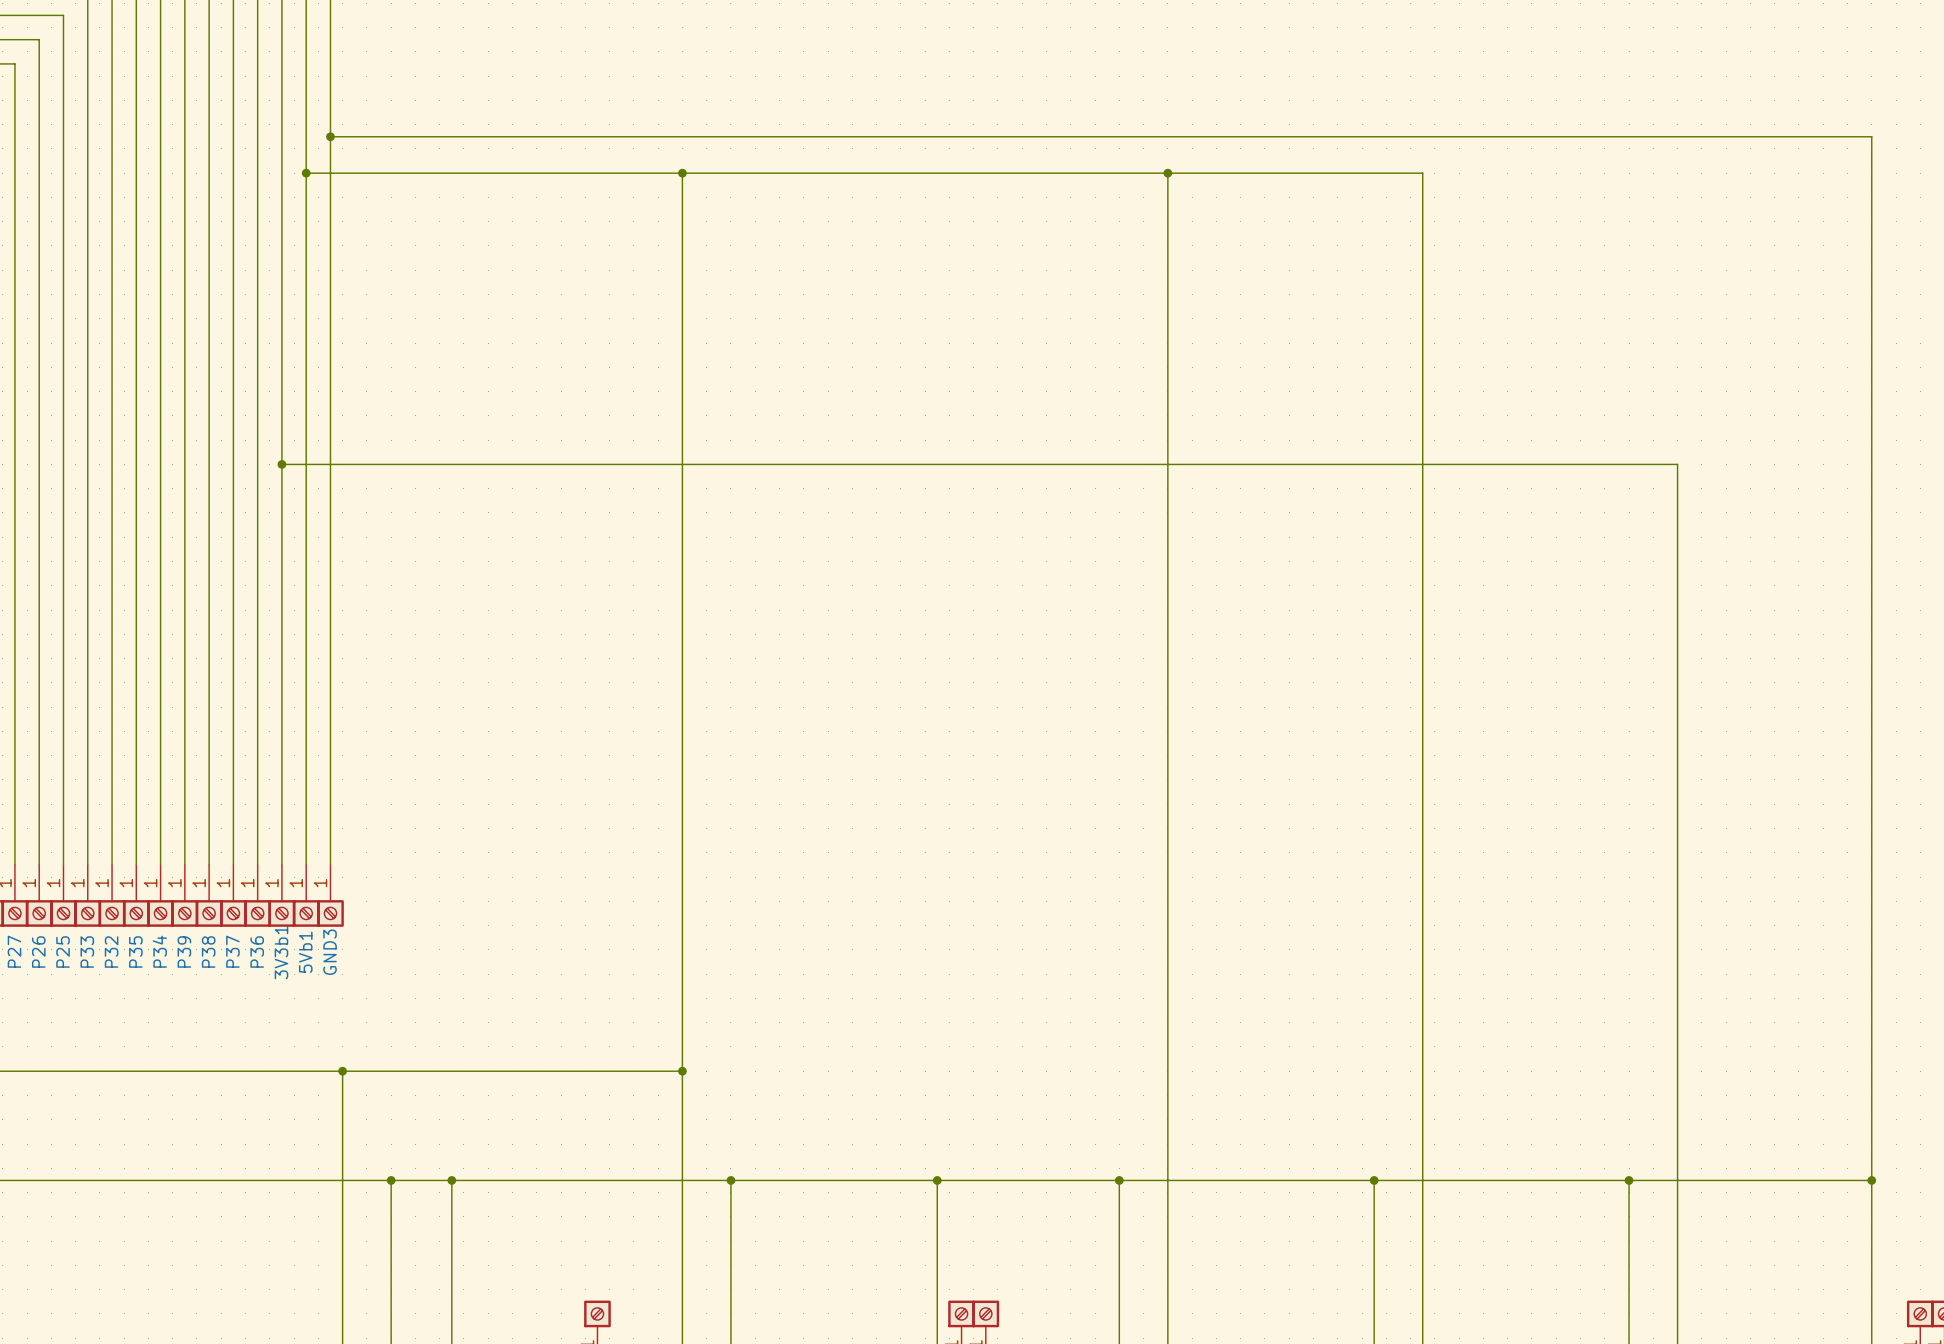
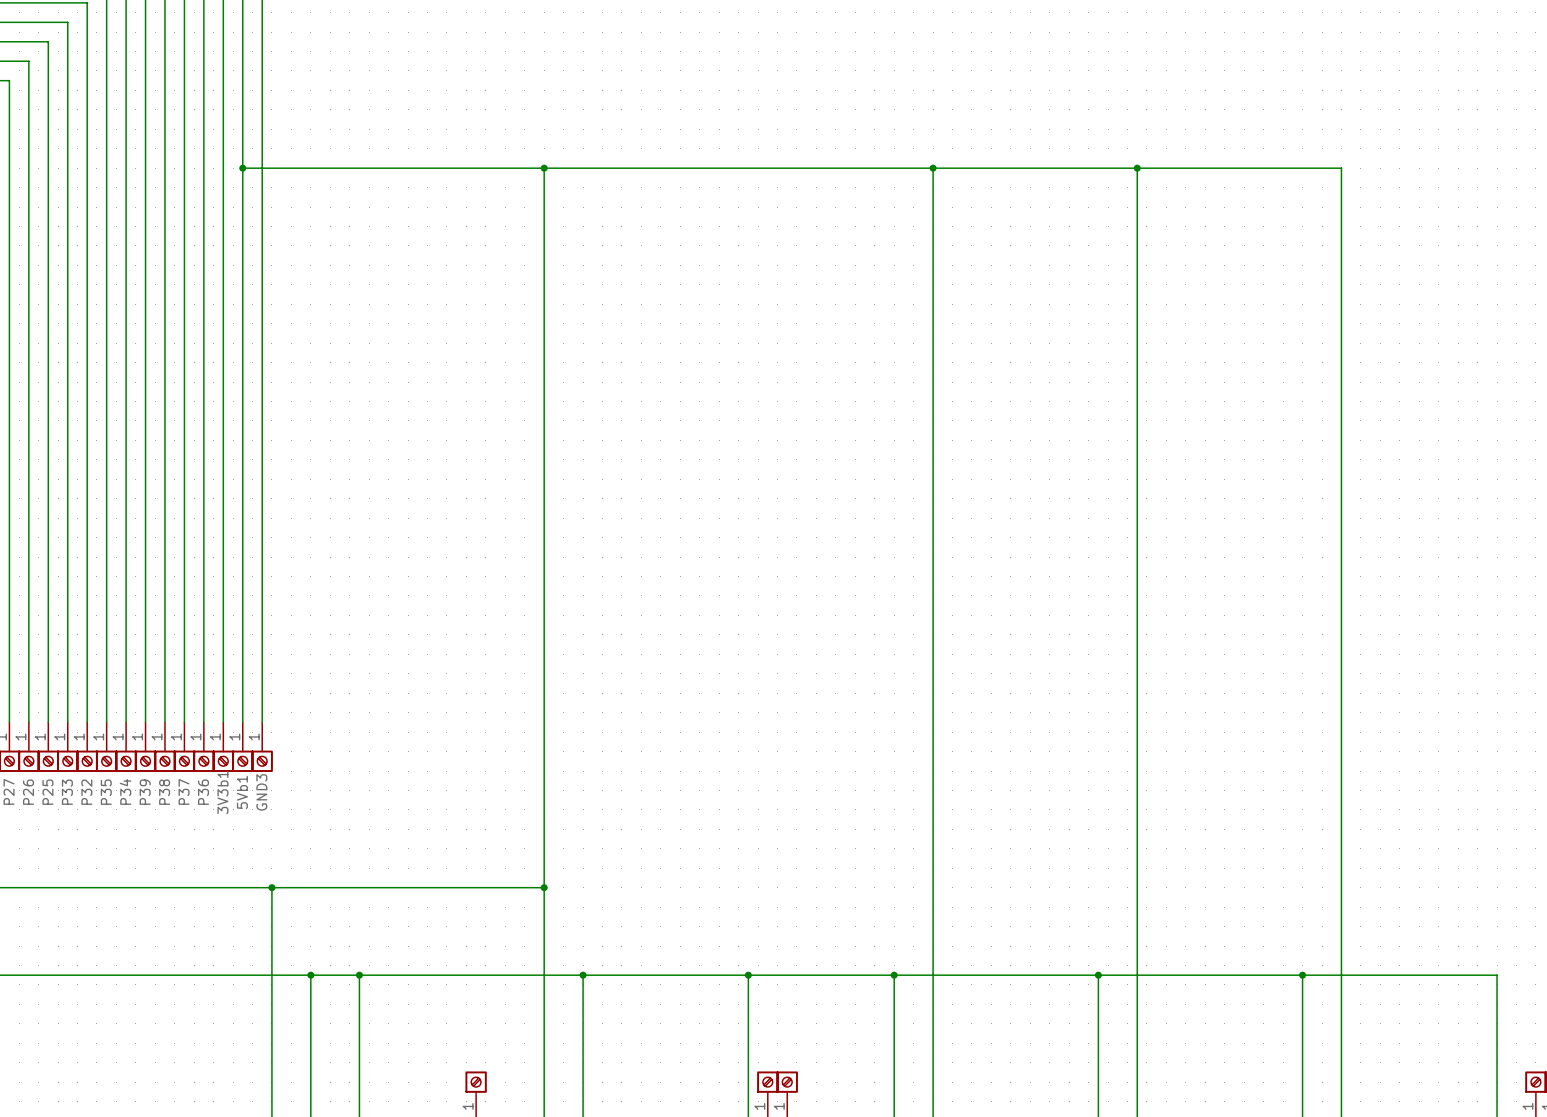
wire: (330, 136) (1871, 136) (1871, 1180) -> none
junction: (330, 136) -> none
junction: none -> (1137, 168)
wire: (281, 464) (1677, 464) -> (1137, 168) (1341, 168) (1341, 401)
junction: (281, 464) -> none
junction: (1871, 1180) -> none

